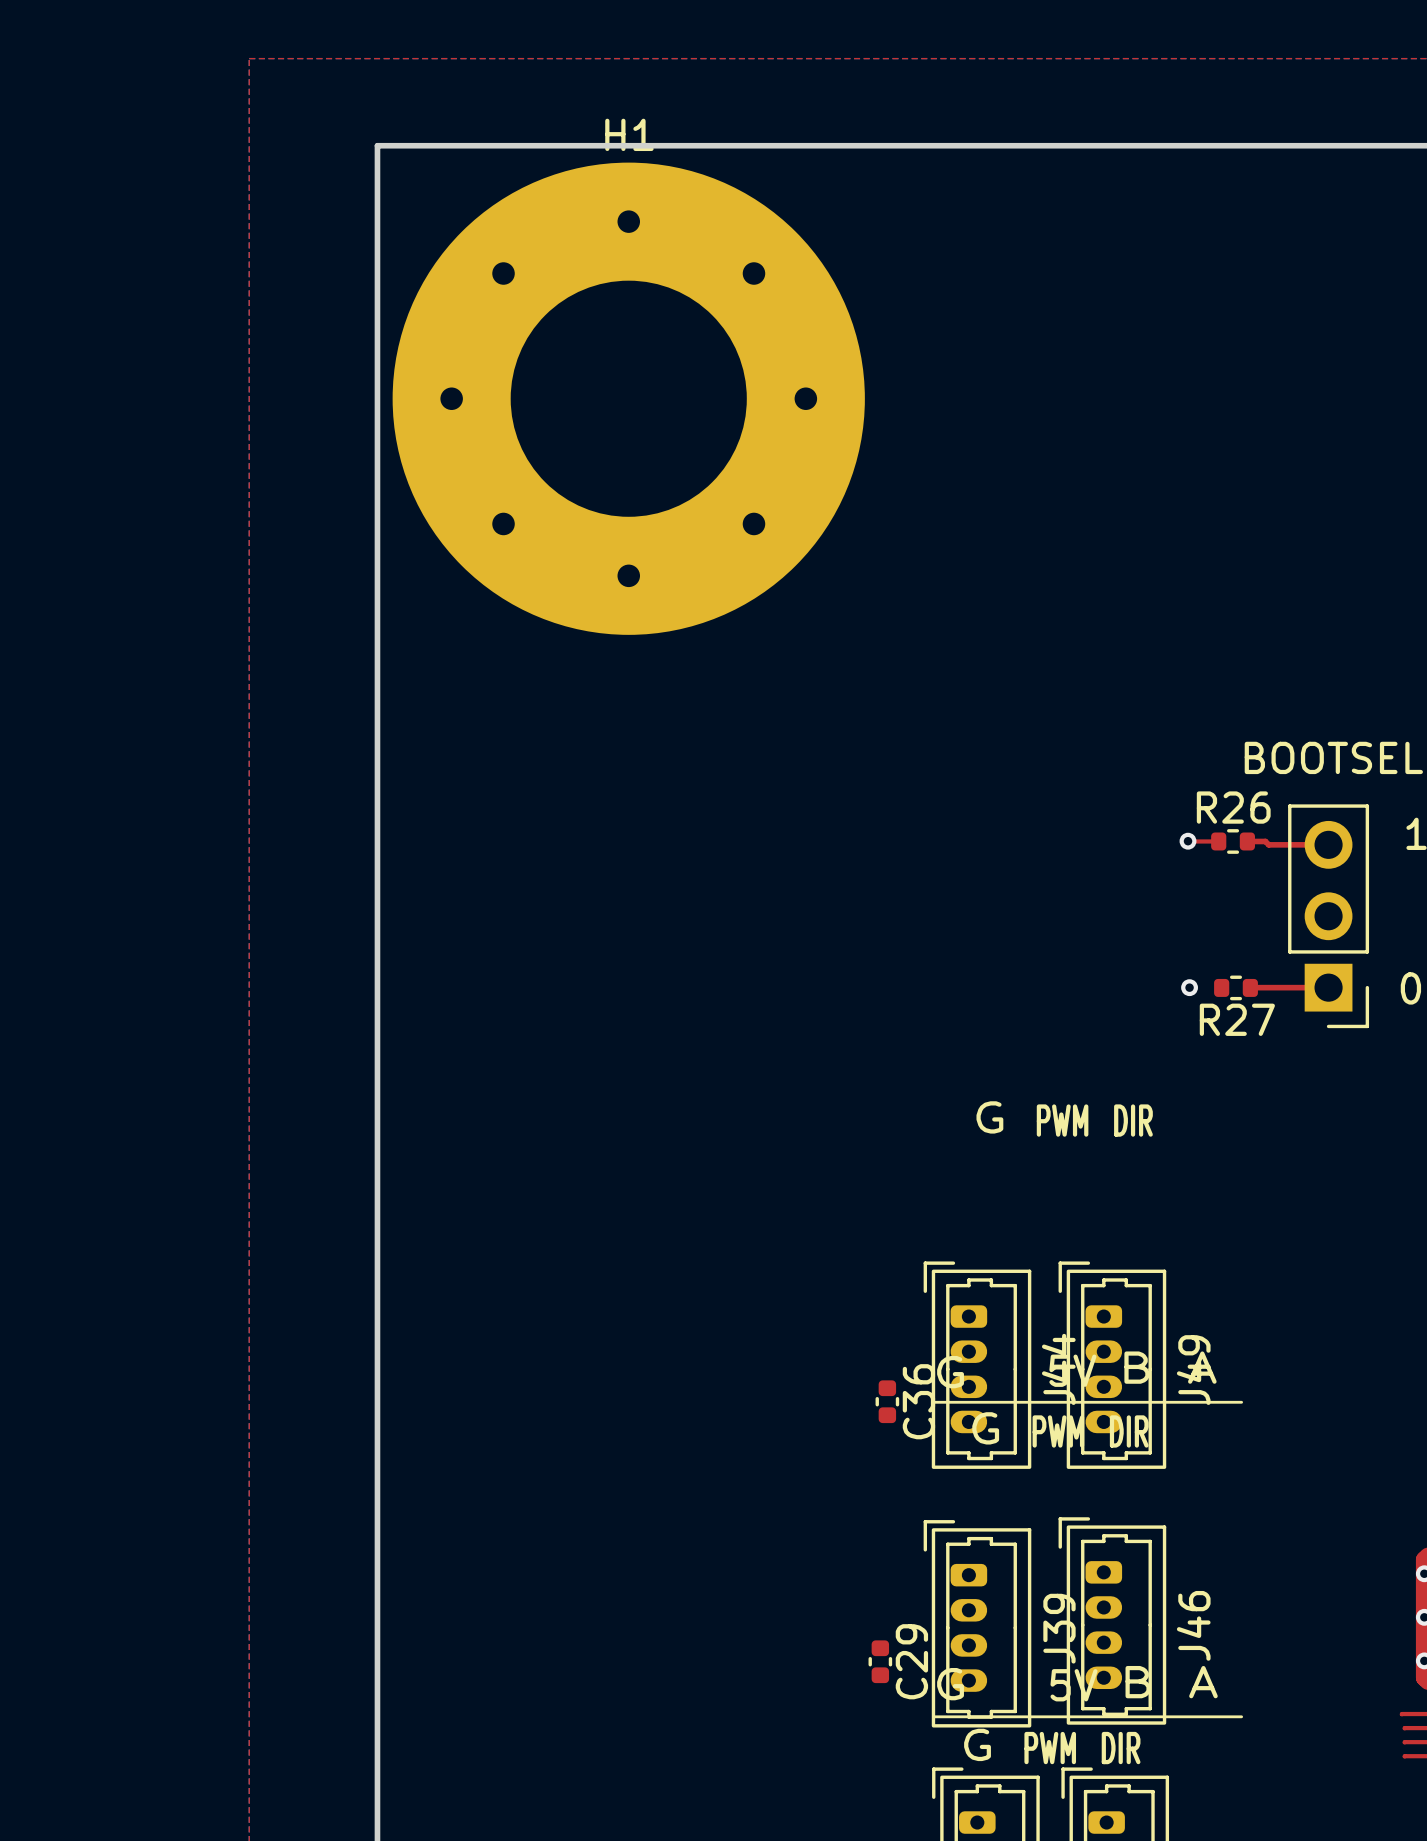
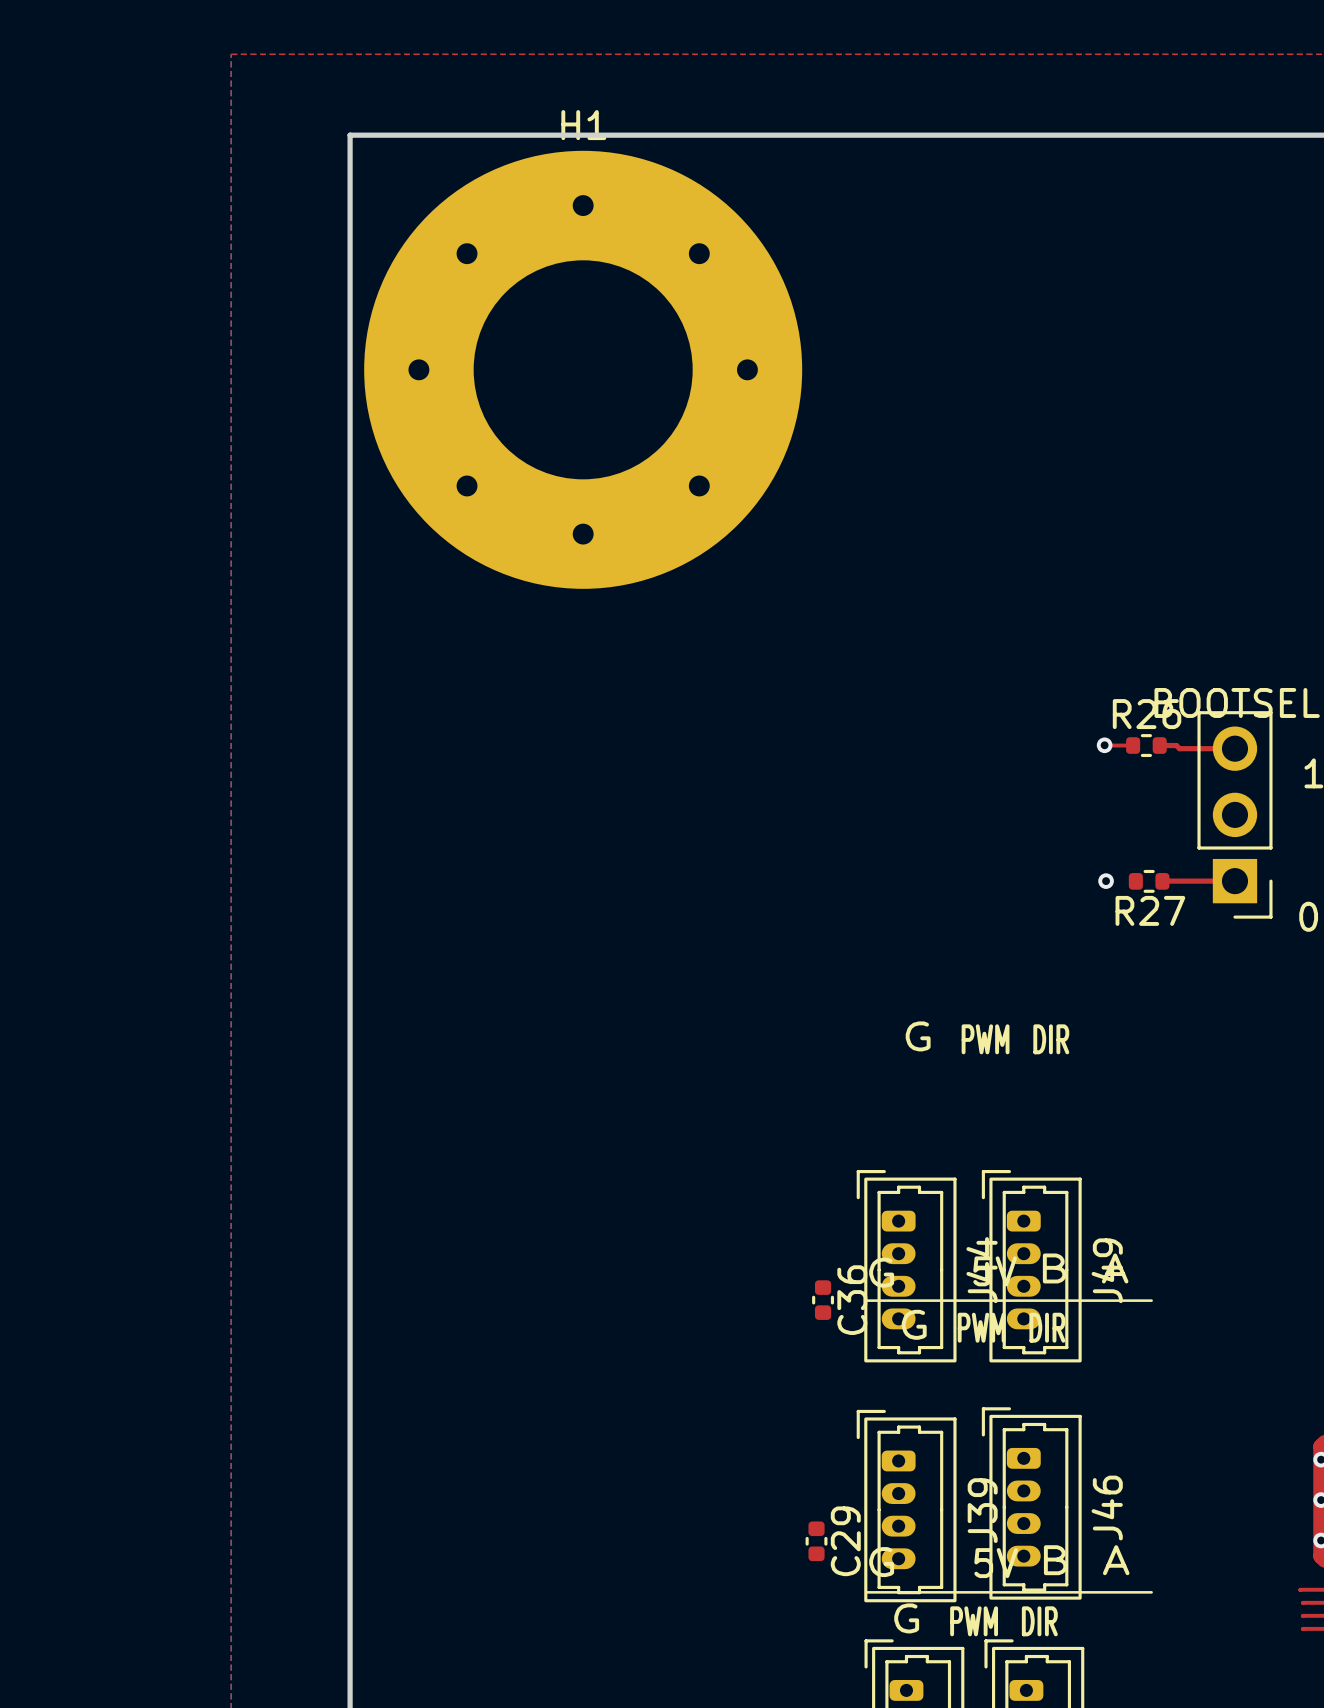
top track: (1188, 841) (1216, 841) -> (1104, 745) (1130, 745)
via position: (1188, 841) -> (1104, 745)
R26 position: (1233, 841) -> (1146, 745)
top track: (1249, 841) (1265, 841) (1268, 844) (1328, 844) -> (1161, 745) (1176, 745) (1179, 748) (1234, 748)
part position: (1328, 916) -> (1234, 814)
via position: (1189, 987) -> (1106, 881)
R27 position: (1236, 987) -> (1149, 881)
top track: (1253, 987) (1328, 987) -> (1164, 881) (1234, 881)

